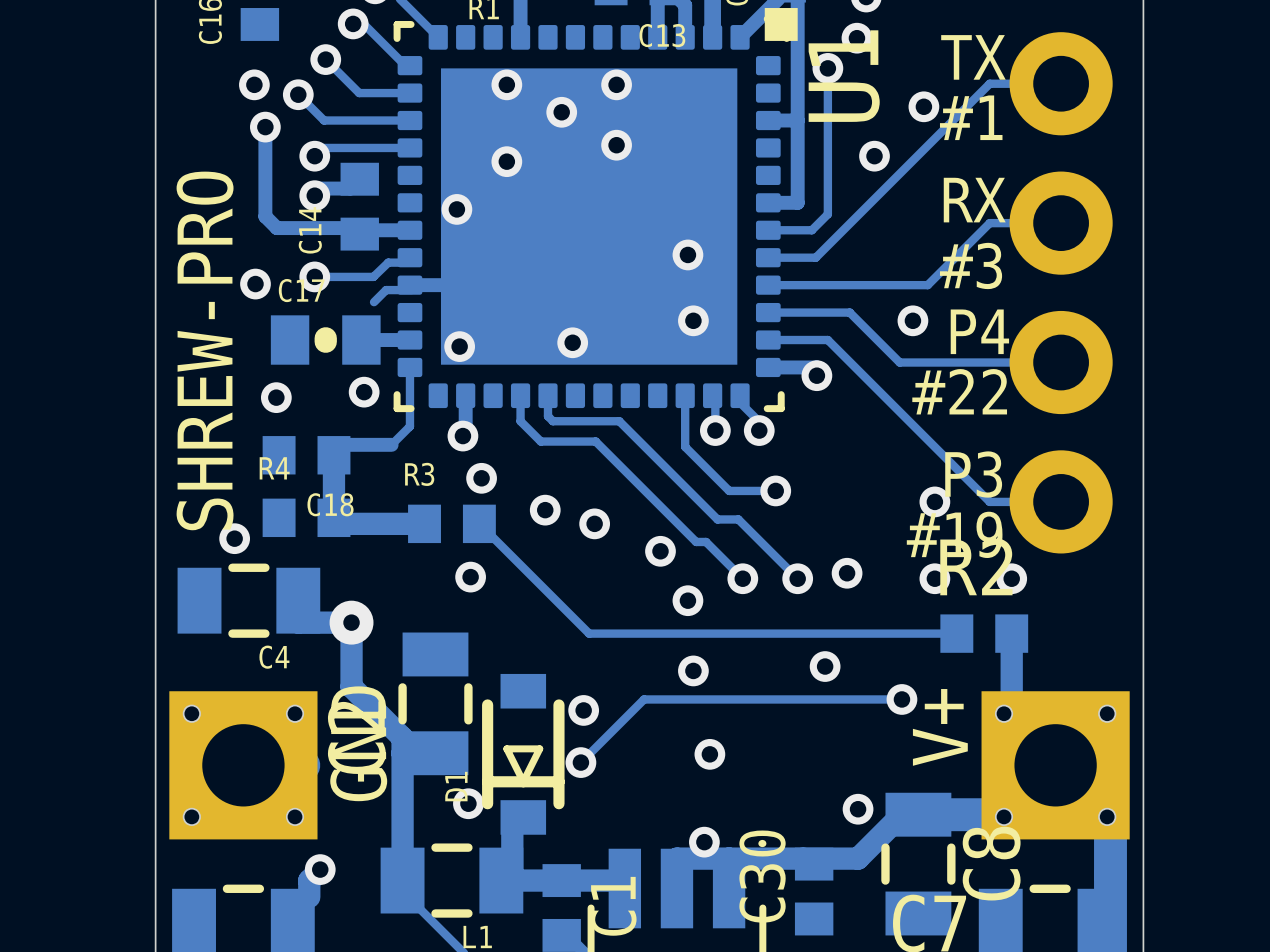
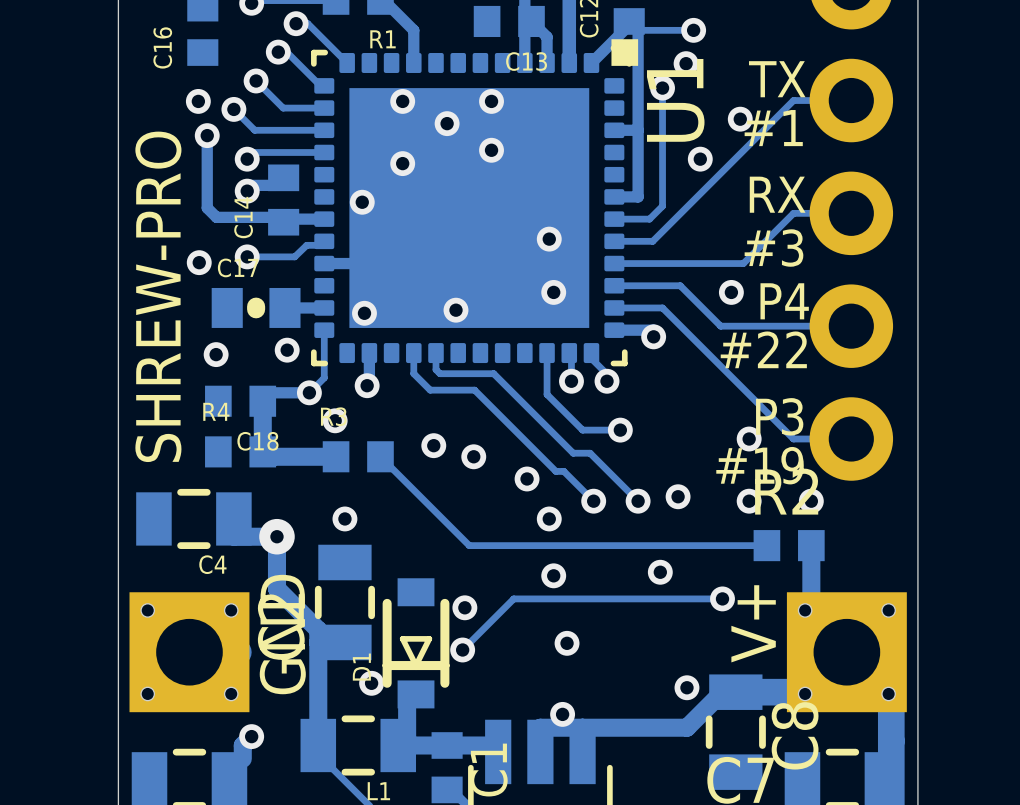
track: (411, 290) (386, 290) (374, 302) -> none
via: none -> (309, 392)
via: (481, 478) -> none
via: none -> (335, 420)
via: (234, 538) -> none
via position: (470, 577) -> (344, 518)
C30: (814, 891) -> none

